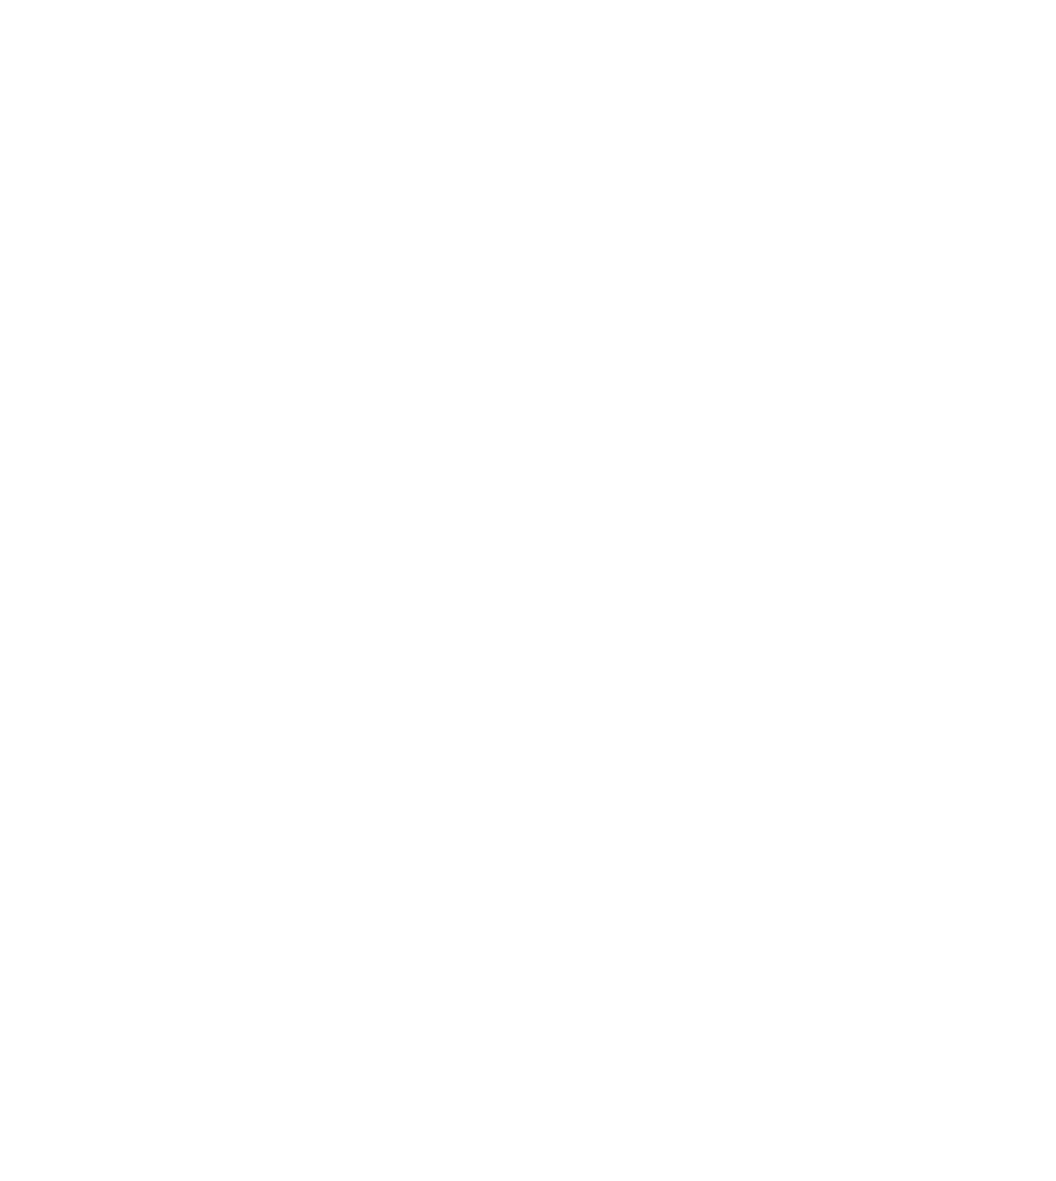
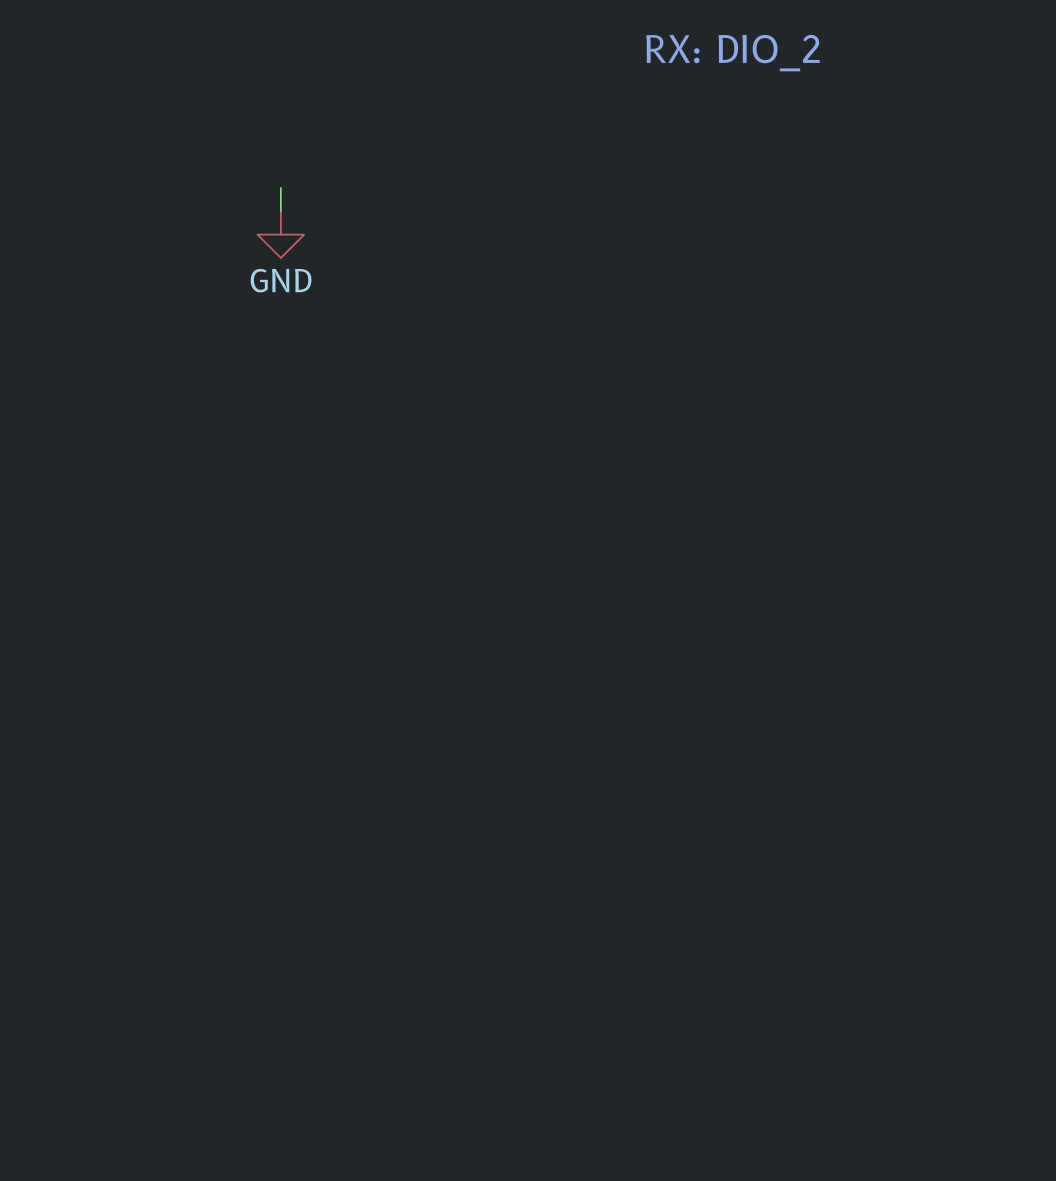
text: none -> RX: DIO_2 (732, 53)
wire: none -> (280, 187) (280, 211)
power symbol: none -> GND (280, 234)

